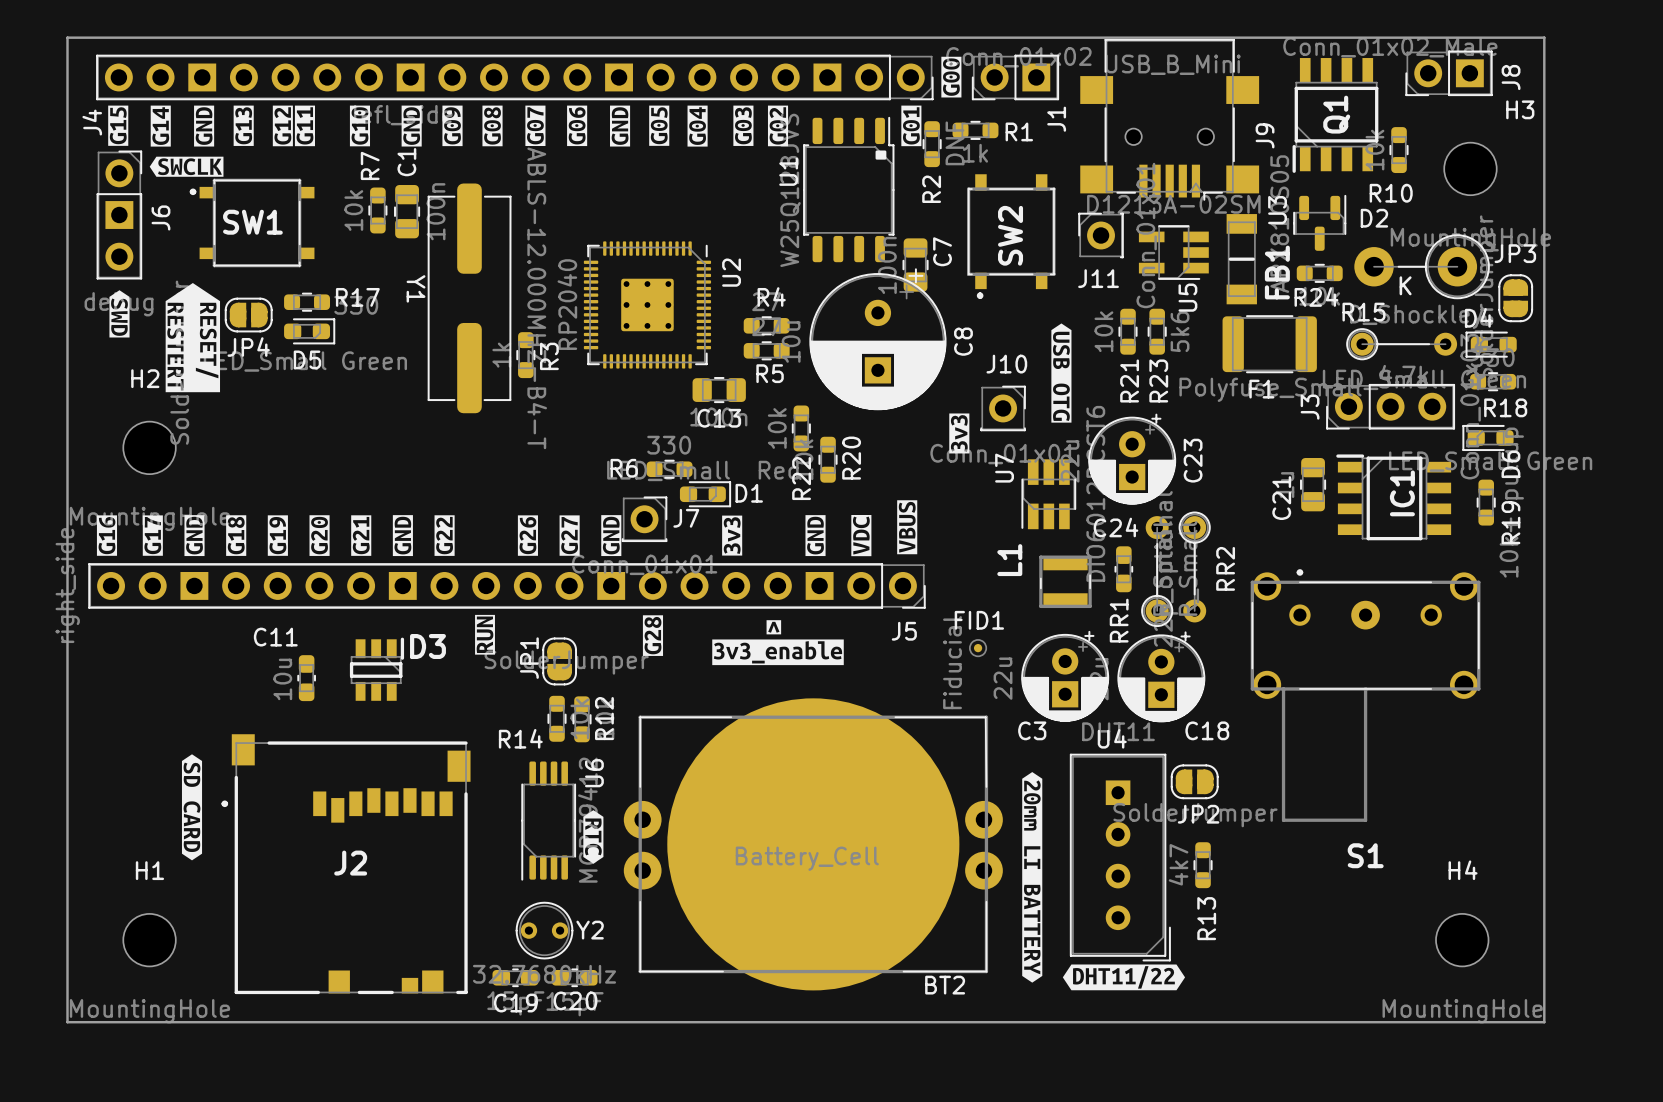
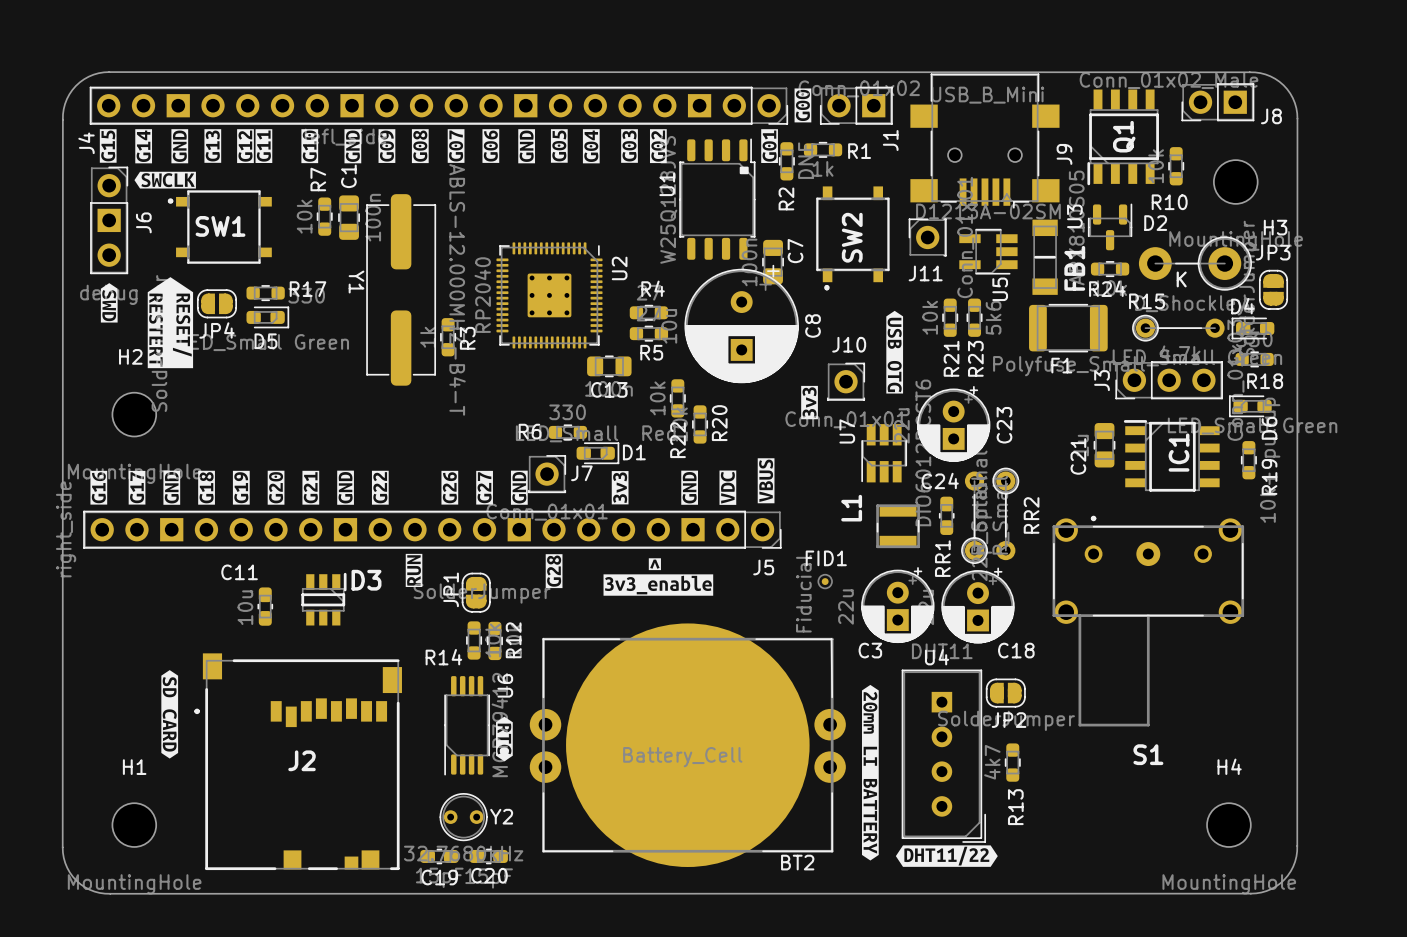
board edge: (67, 37) (1544, 37) (1544, 1022) (67, 1022) (67, 37) -> (109, 72) (93, 74) (79, 82) (69, 94) (63, 114) (62, 847) (67, 867) (76, 880) (84, 887) (94, 891) (110, 893) (1250, 893) (1266, 891) (1276, 886) (1290, 871) (1295, 861) (1297, 845) (1297, 118) (1294, 103) (1290, 93) (1275, 78) (1265, 74) (1249, 72) (109, 72)
J8 name rotation: 0° (1511, 77) -> 90° clockwise (1271, 116)
H3 name position: H3 (1520, 109) -> H3 (1275, 227)

